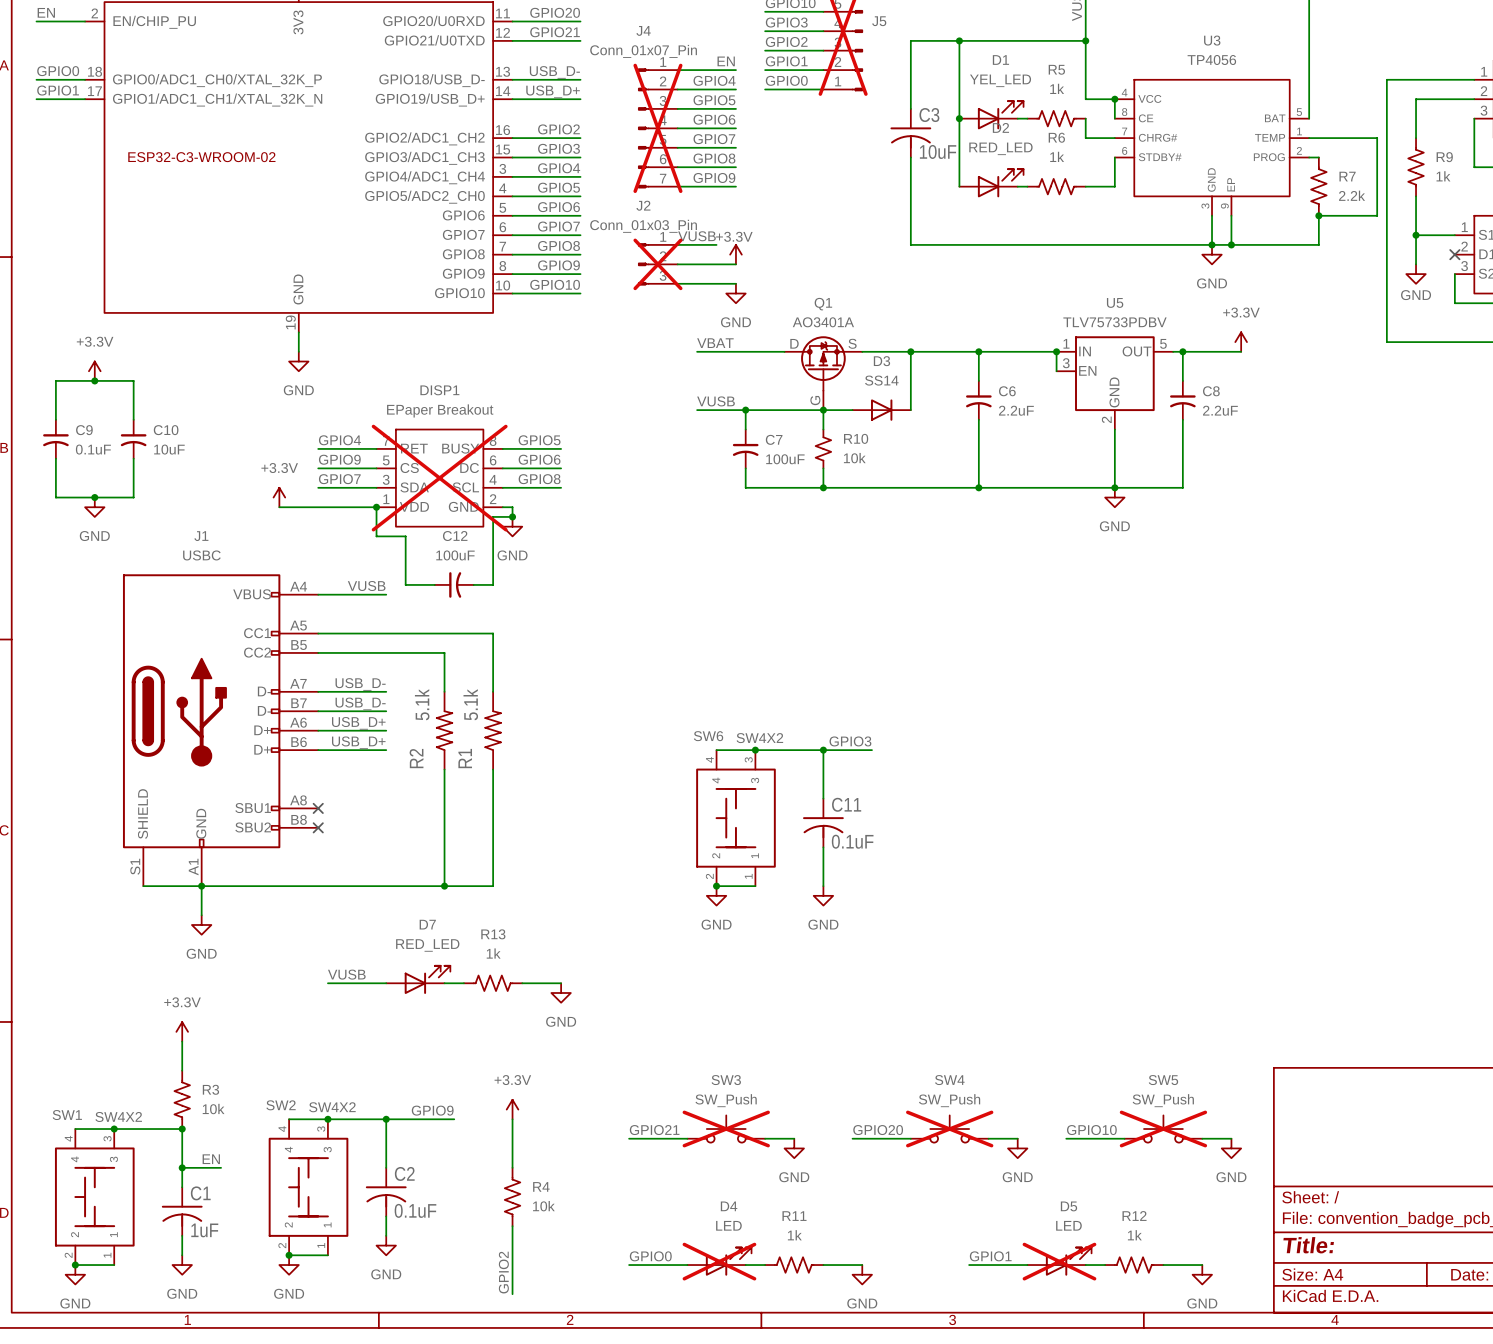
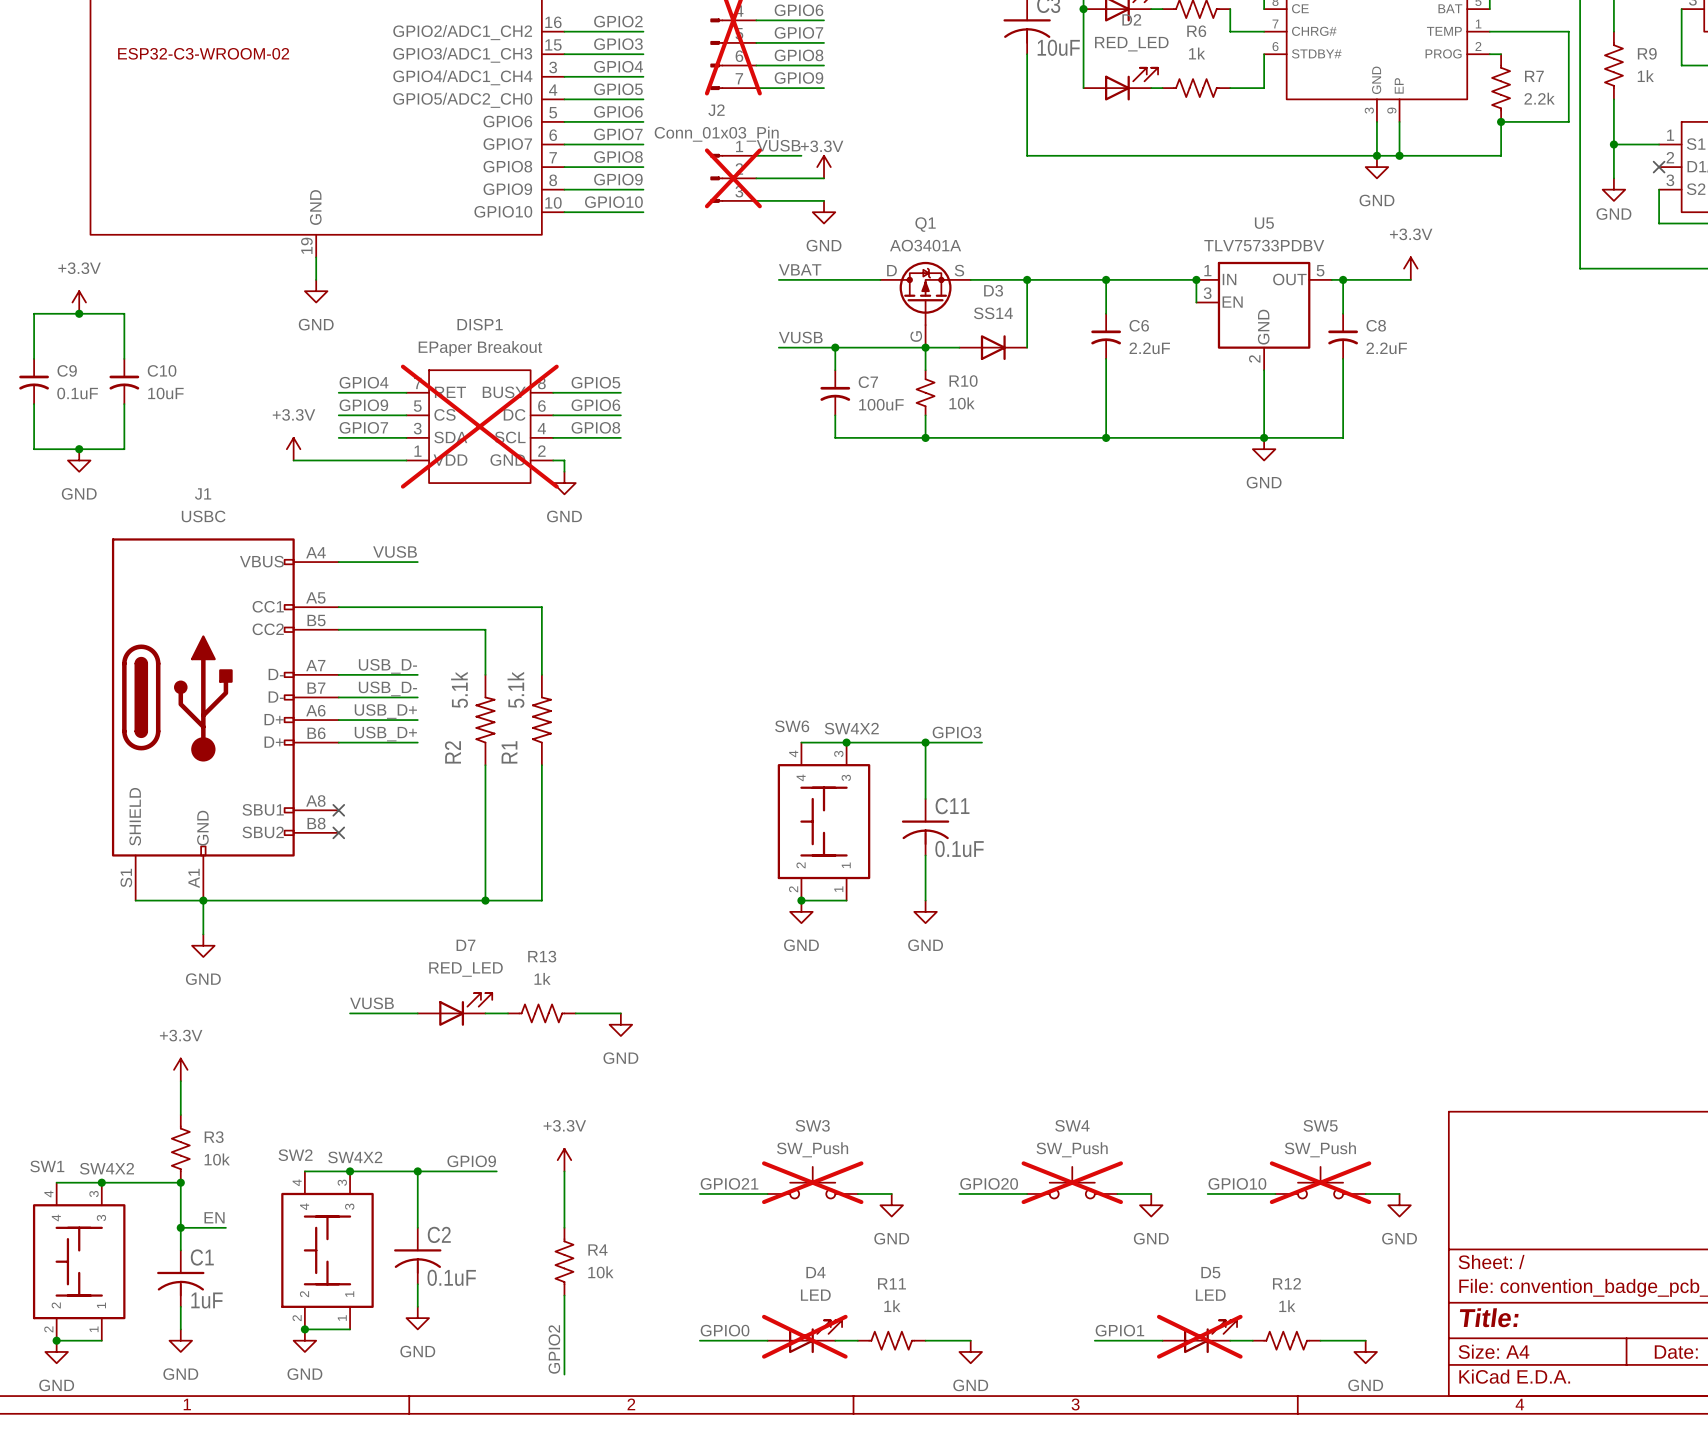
wire: (376, 507) (376, 536) (405, 536) (405, 584) (434, 584) -> none
junction: (376, 507) -> none
wire: (512, 516) (493, 516) (493, 584) (473, 584) -> none
junction: (512, 516) -> none
C12: 100uF (454, 584) -> none

